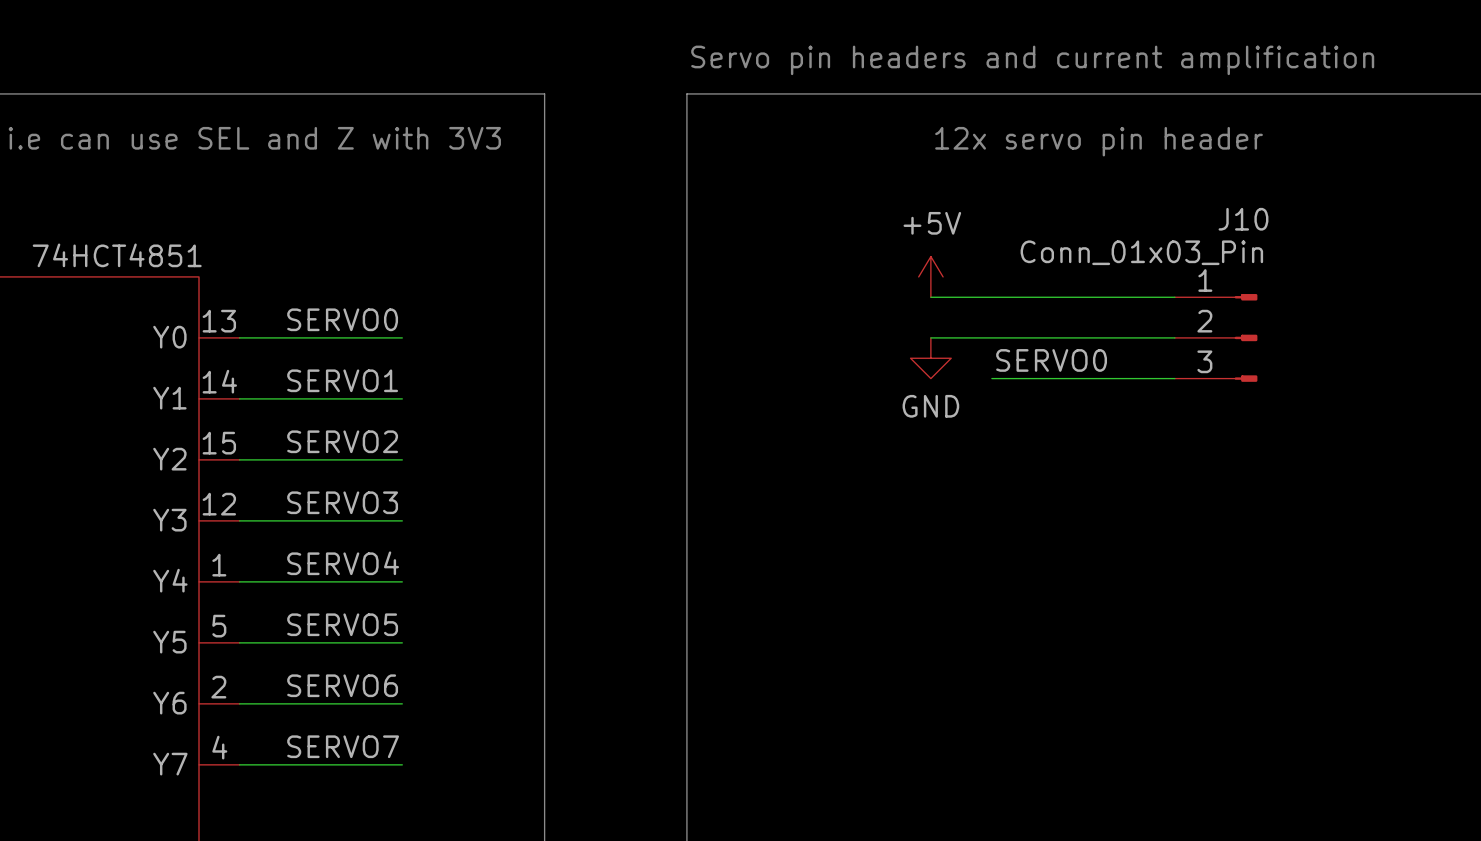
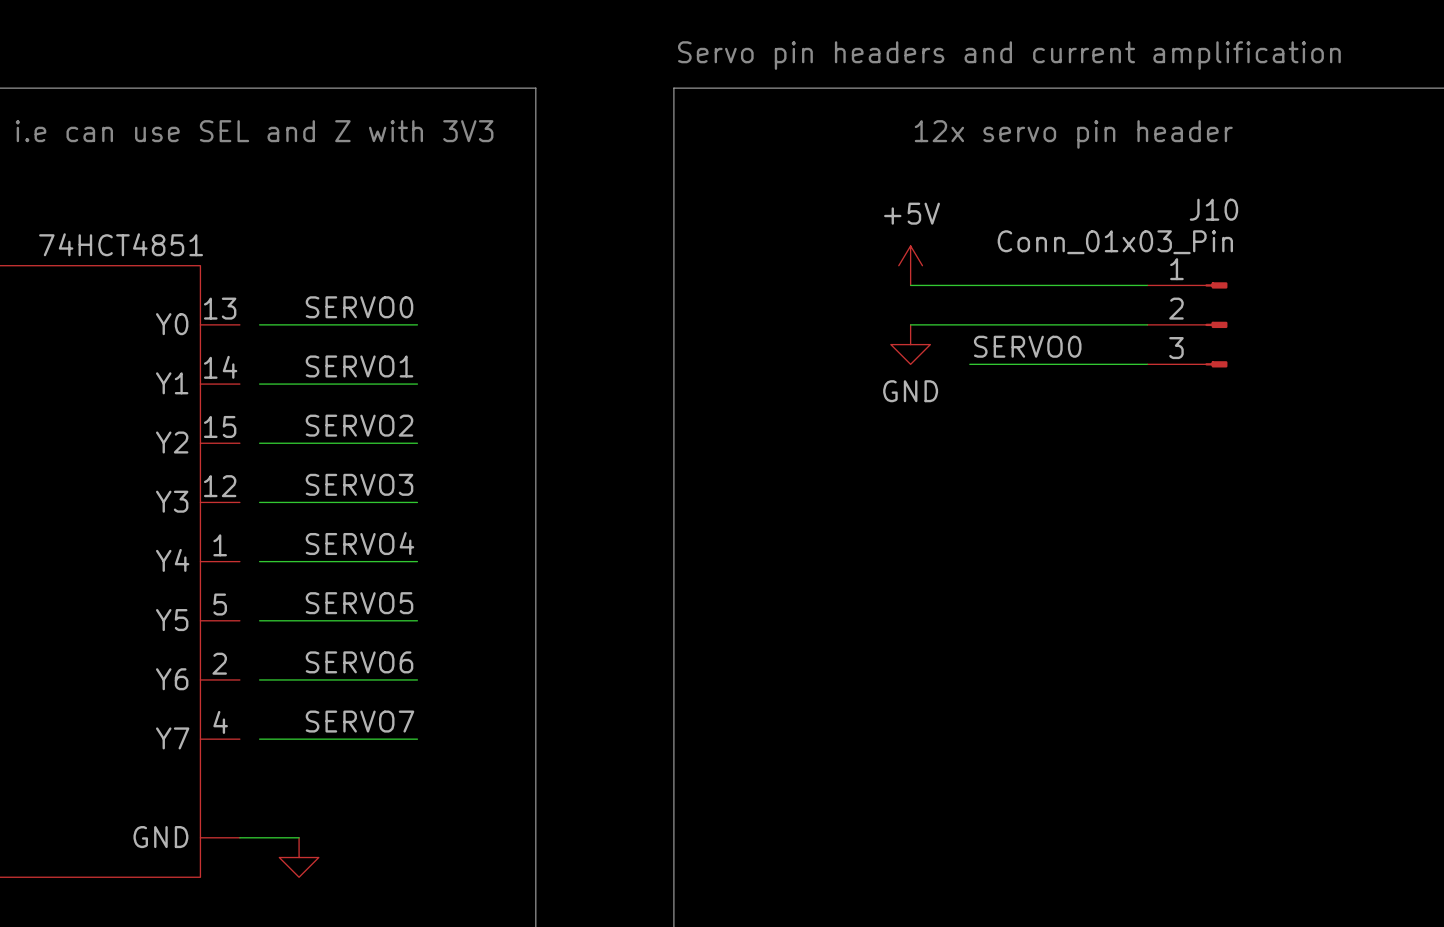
label position: SERVO0 (342, 319) -> SERVO0 (359, 307)
wire: (239, 337) (259, 337) -> (397, 324) (417, 324)
label position: SERVO1 (342, 380) -> SERVO1 (359, 366)
wire: (239, 398) (259, 398) -> (397, 384) (417, 384)
label position: SERVO2 (342, 441) -> SERVO2 (359, 425)
wire: (239, 459) (259, 459) -> (397, 443) (417, 443)
label position: SERVO3 (342, 502) -> SERVO3 (359, 484)
wire: (239, 520) (259, 520) -> (397, 502) (417, 502)
label position: SERVO4 (343, 563) -> SERVO4 (359, 543)
wire: (239, 581) (259, 581) -> (397, 561) (417, 561)
label position: SERVO5 (342, 624) -> SERVO5 (359, 603)
wire: (239, 642) (259, 642) -> (397, 620) (417, 620)
label position: SERVO6 (342, 685) -> SERVO6 (359, 662)
wire: (239, 703) (259, 703) -> (397, 679) (417, 679)
label position: SERVO7 (343, 746) -> SERVO7 (359, 721)
wire: (239, 764) (259, 764) -> (397, 739) (417, 739)

